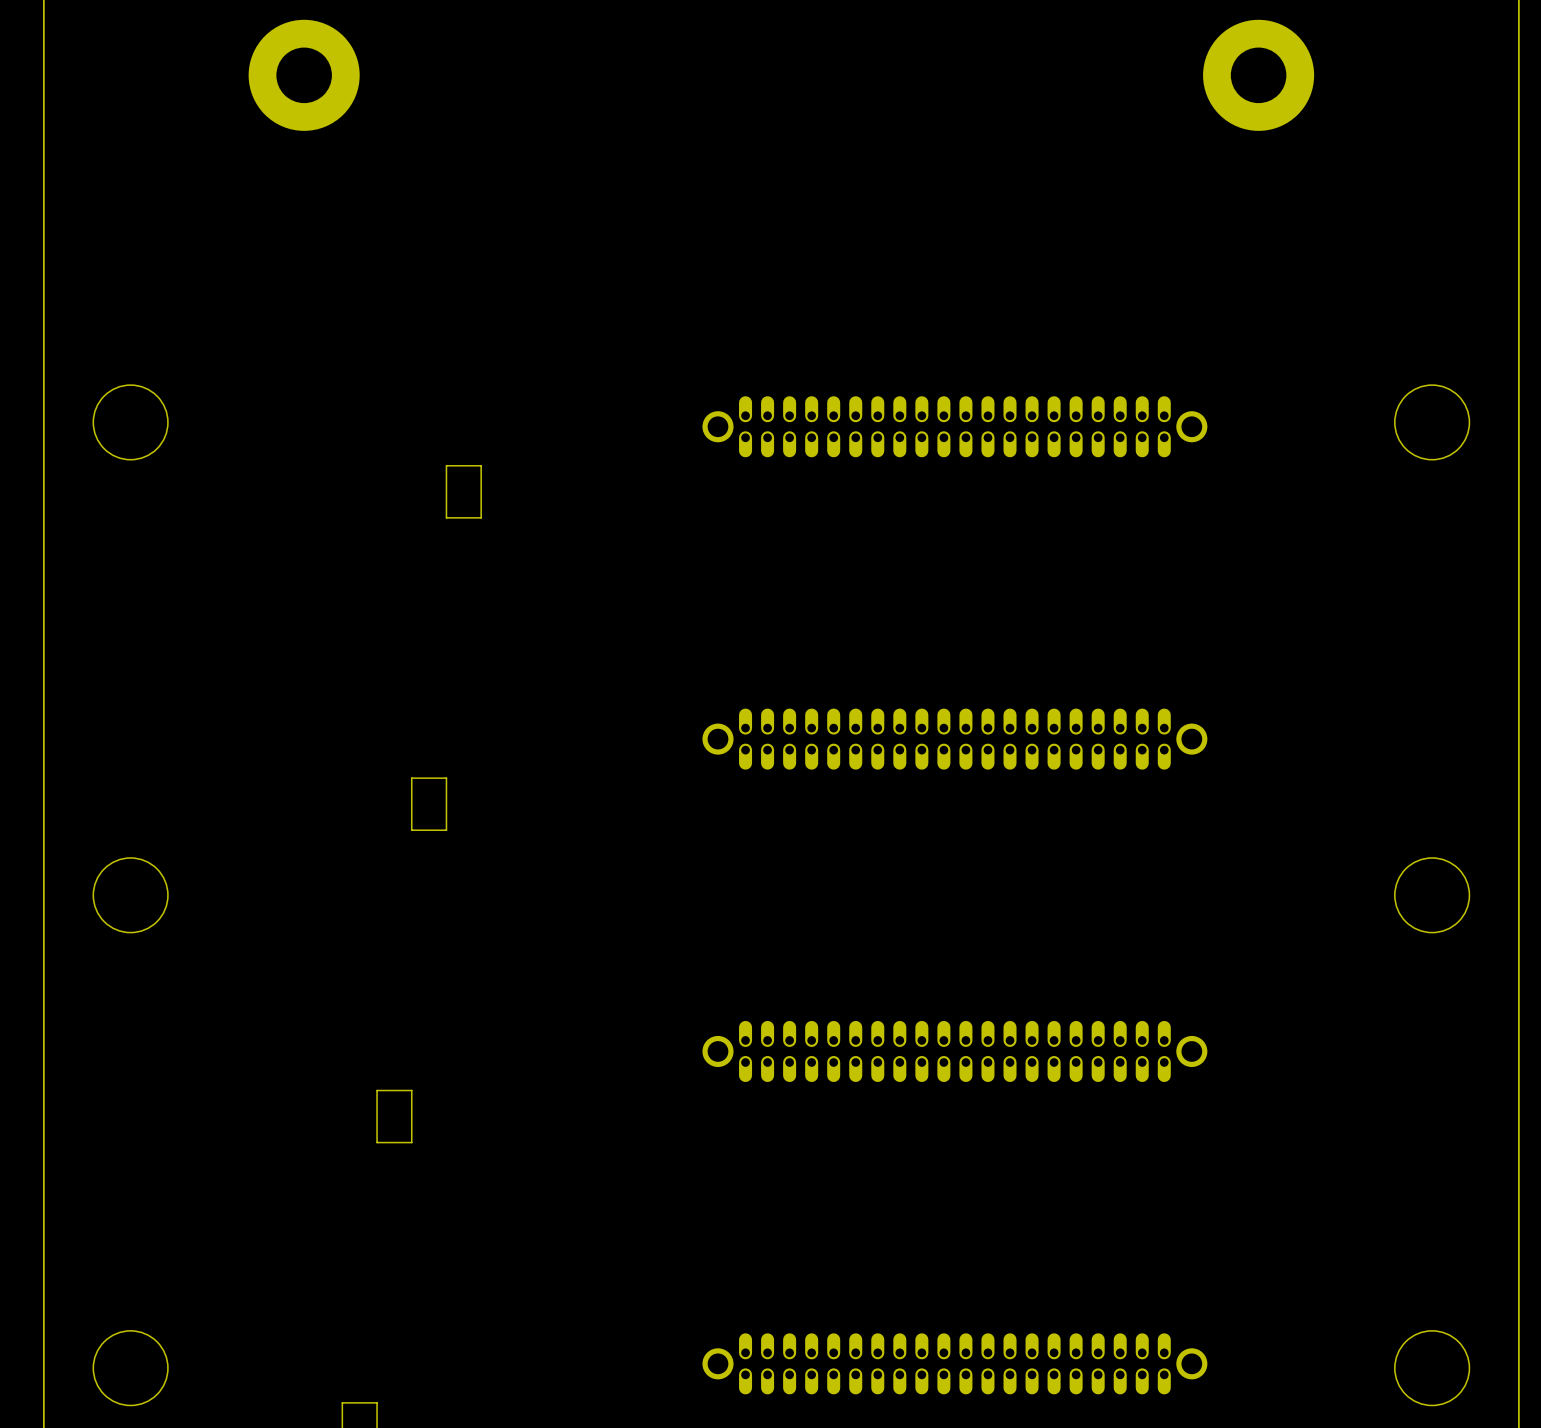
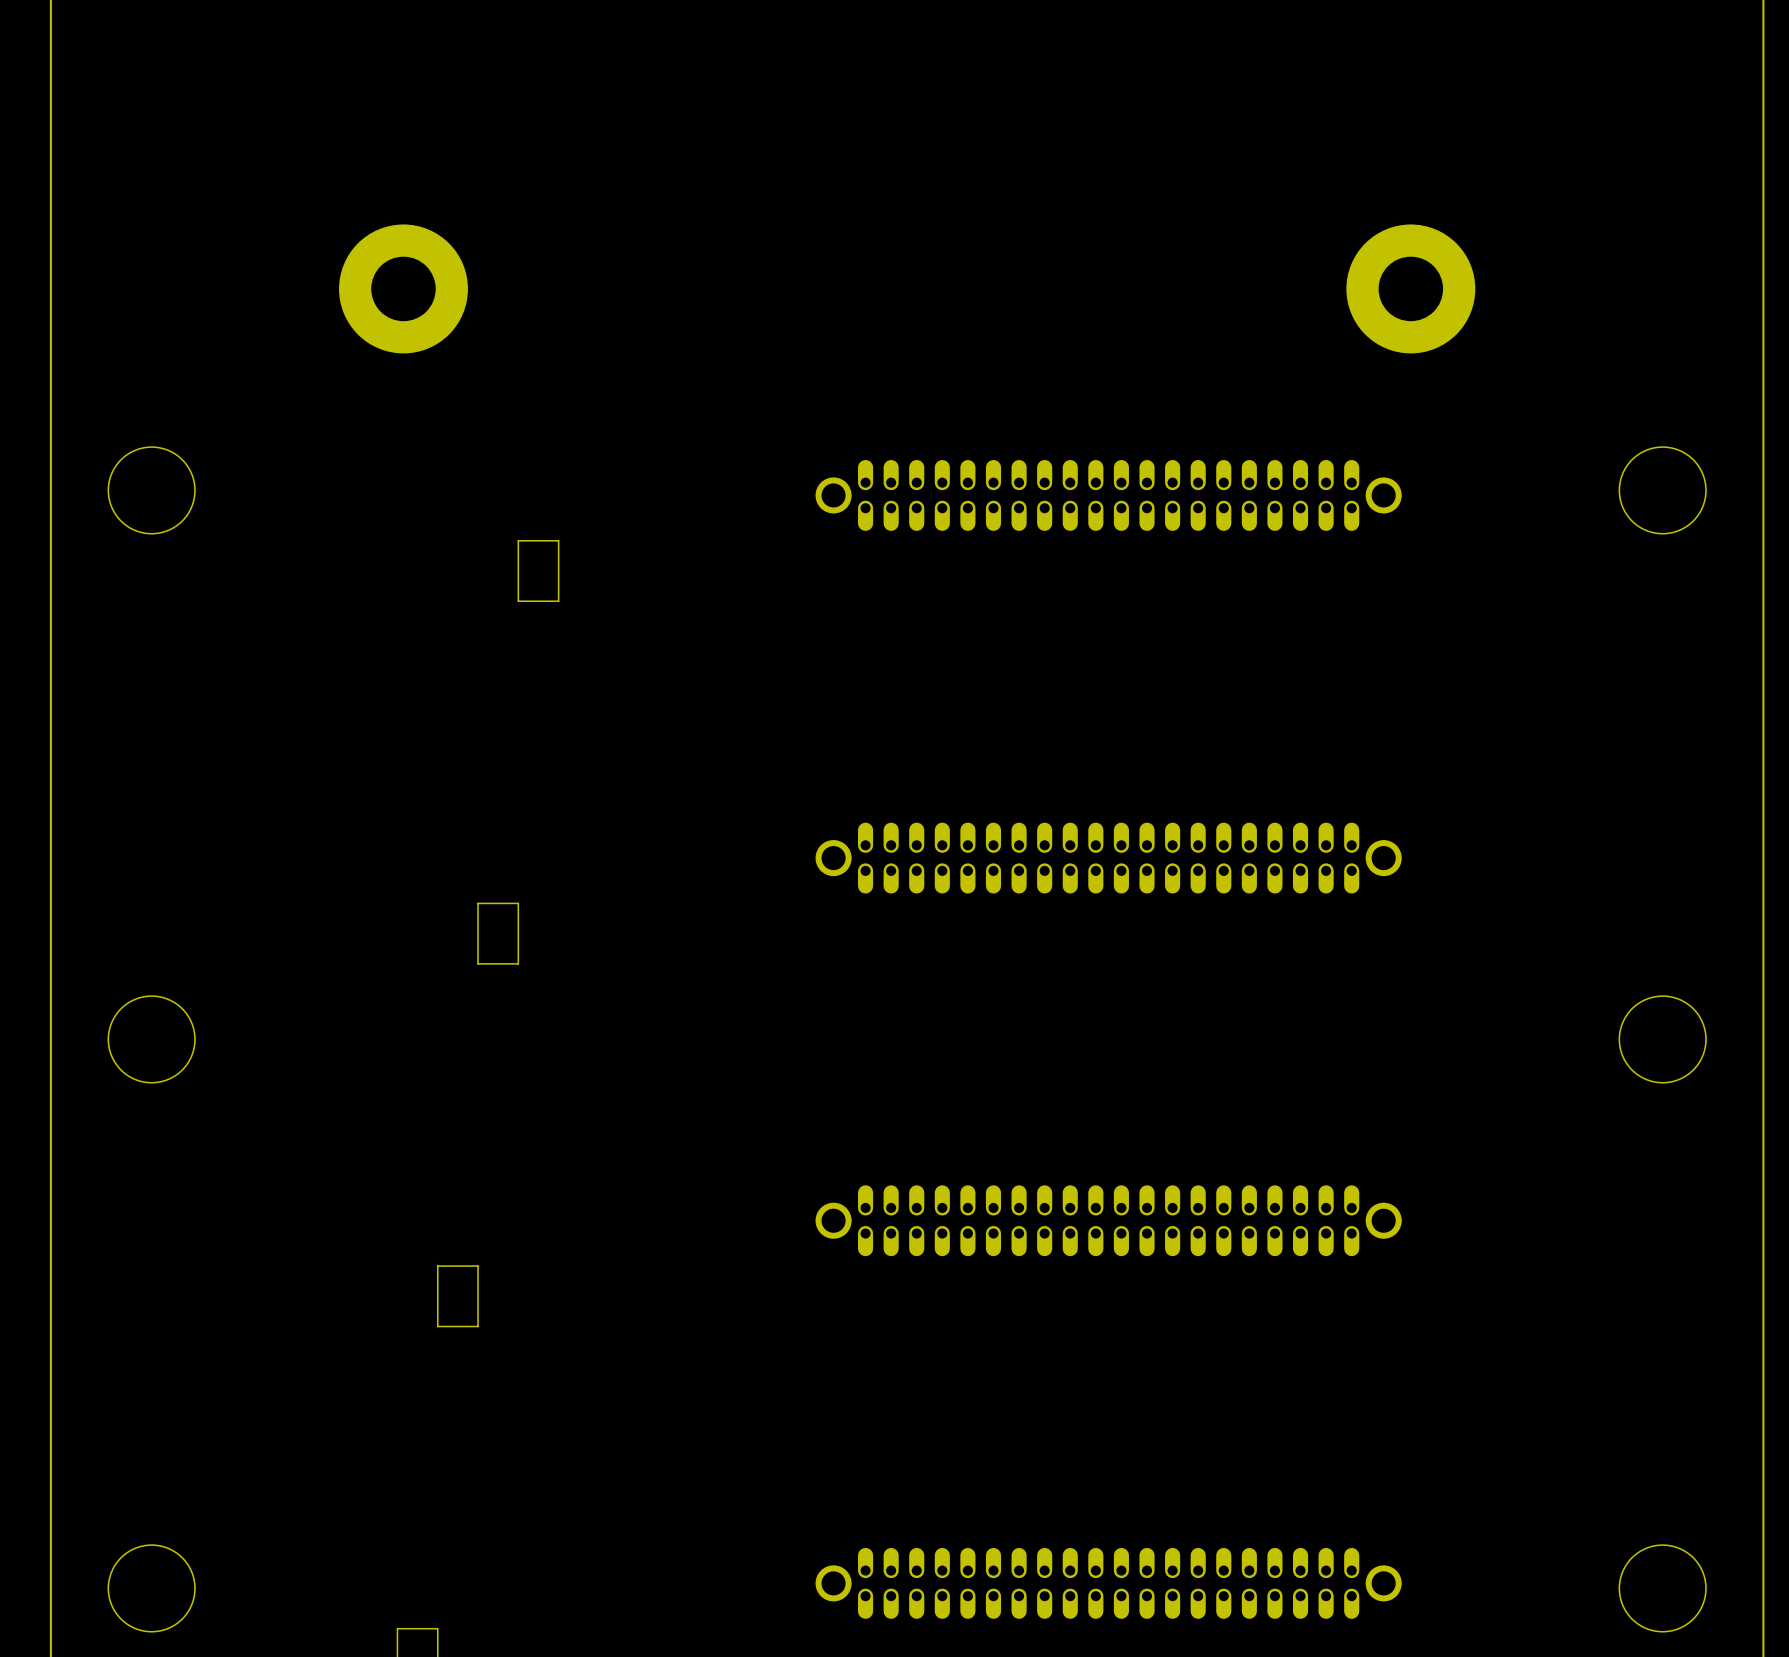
part position: (304, 75) -> (403, 288)
part position: (1258, 75) -> (1410, 288)

